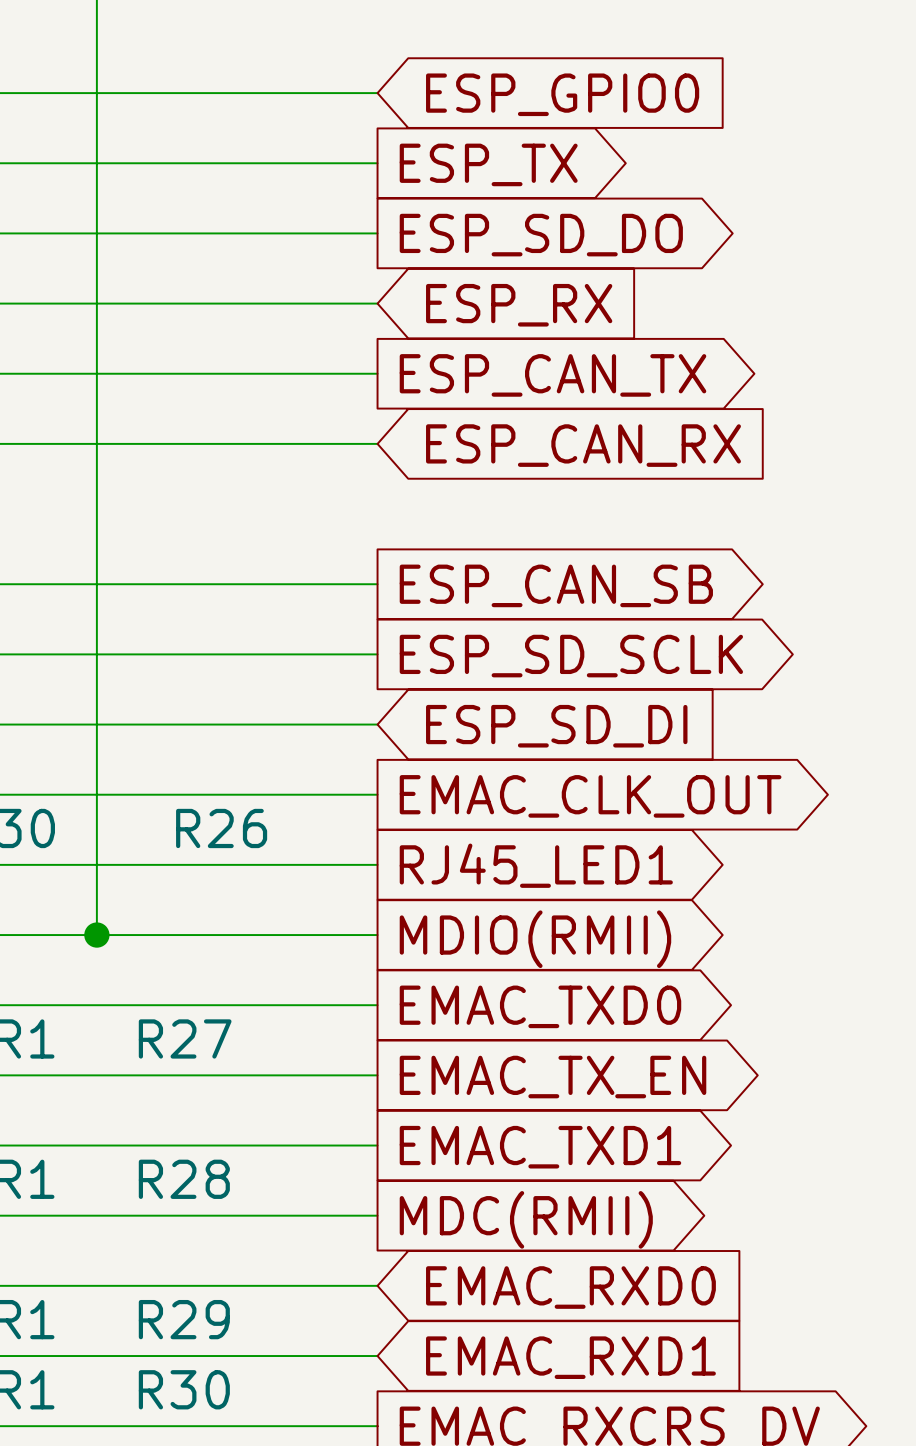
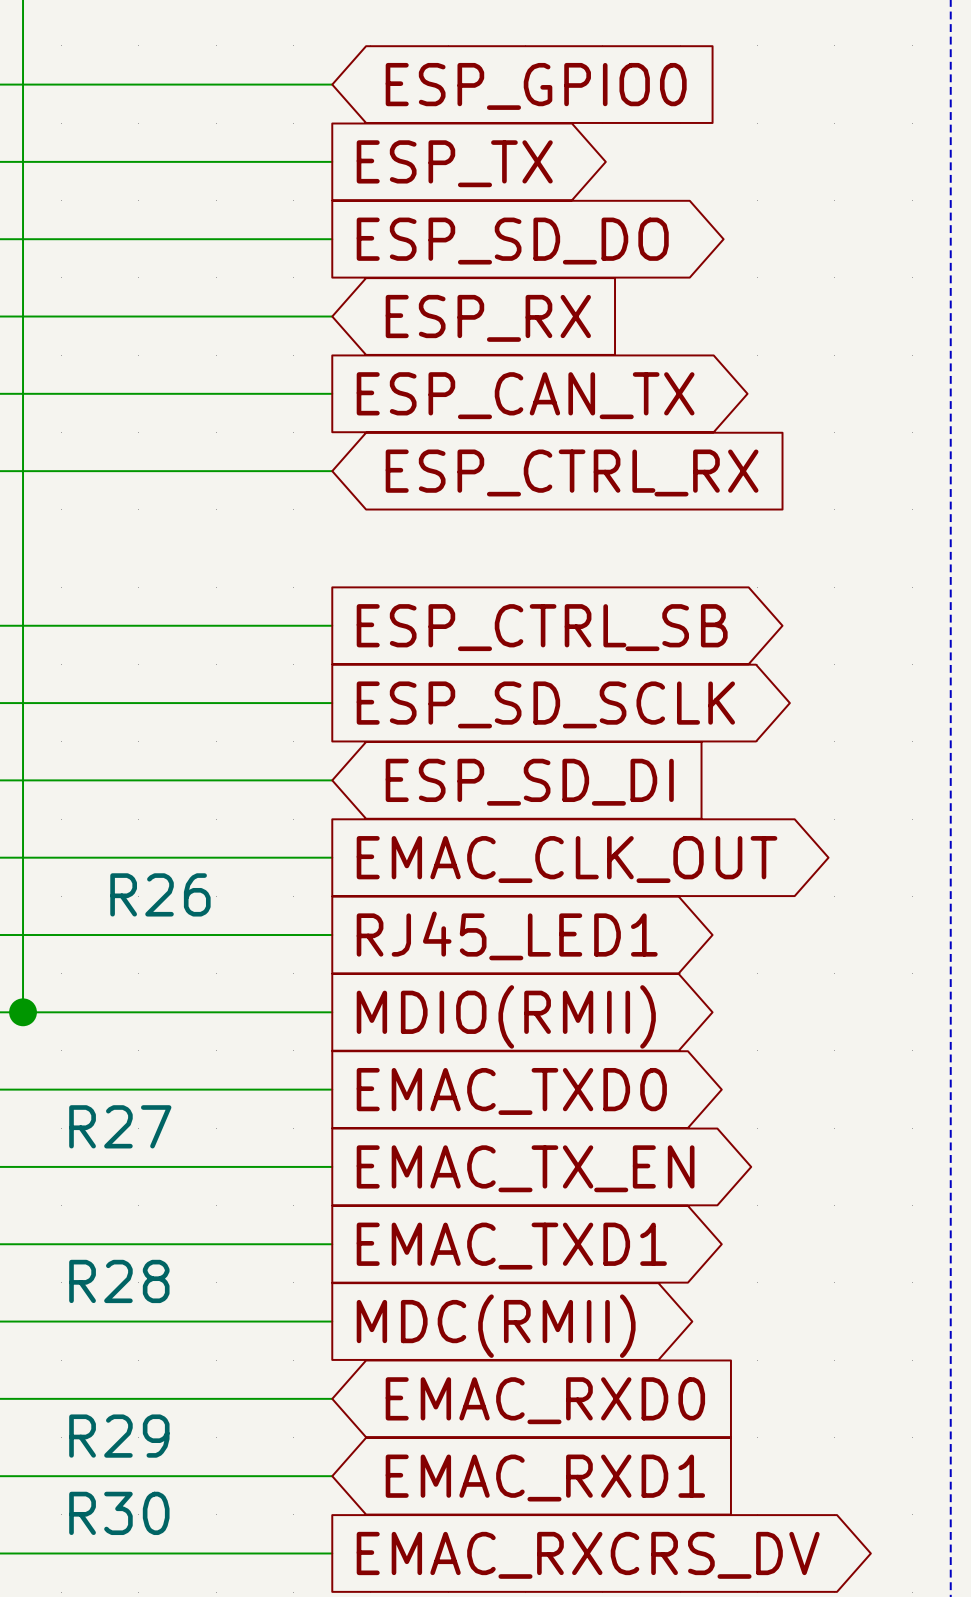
global label: ESP_CAN_RX (583, 445) -> ESP_CTRL_RX (572, 472)
global label: ESP_CAN_SB (556, 585) -> ESP_CTRL_SB (542, 627)

